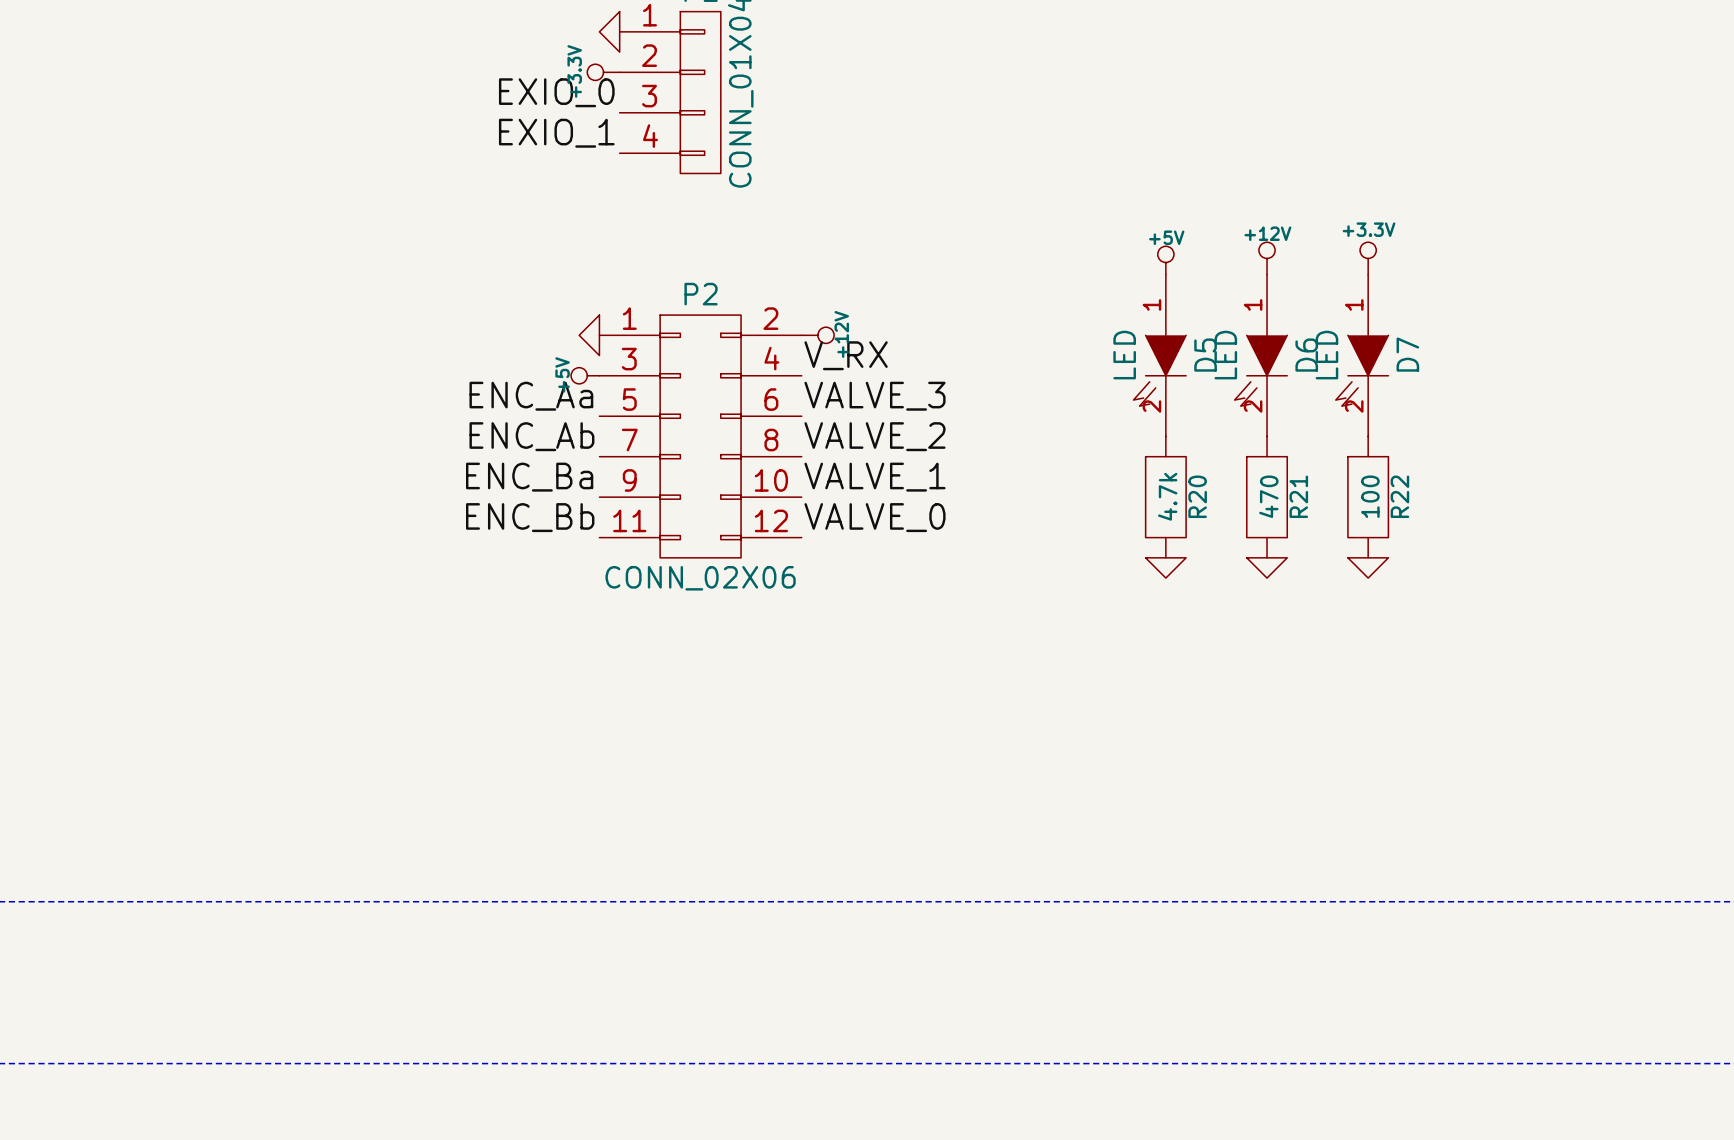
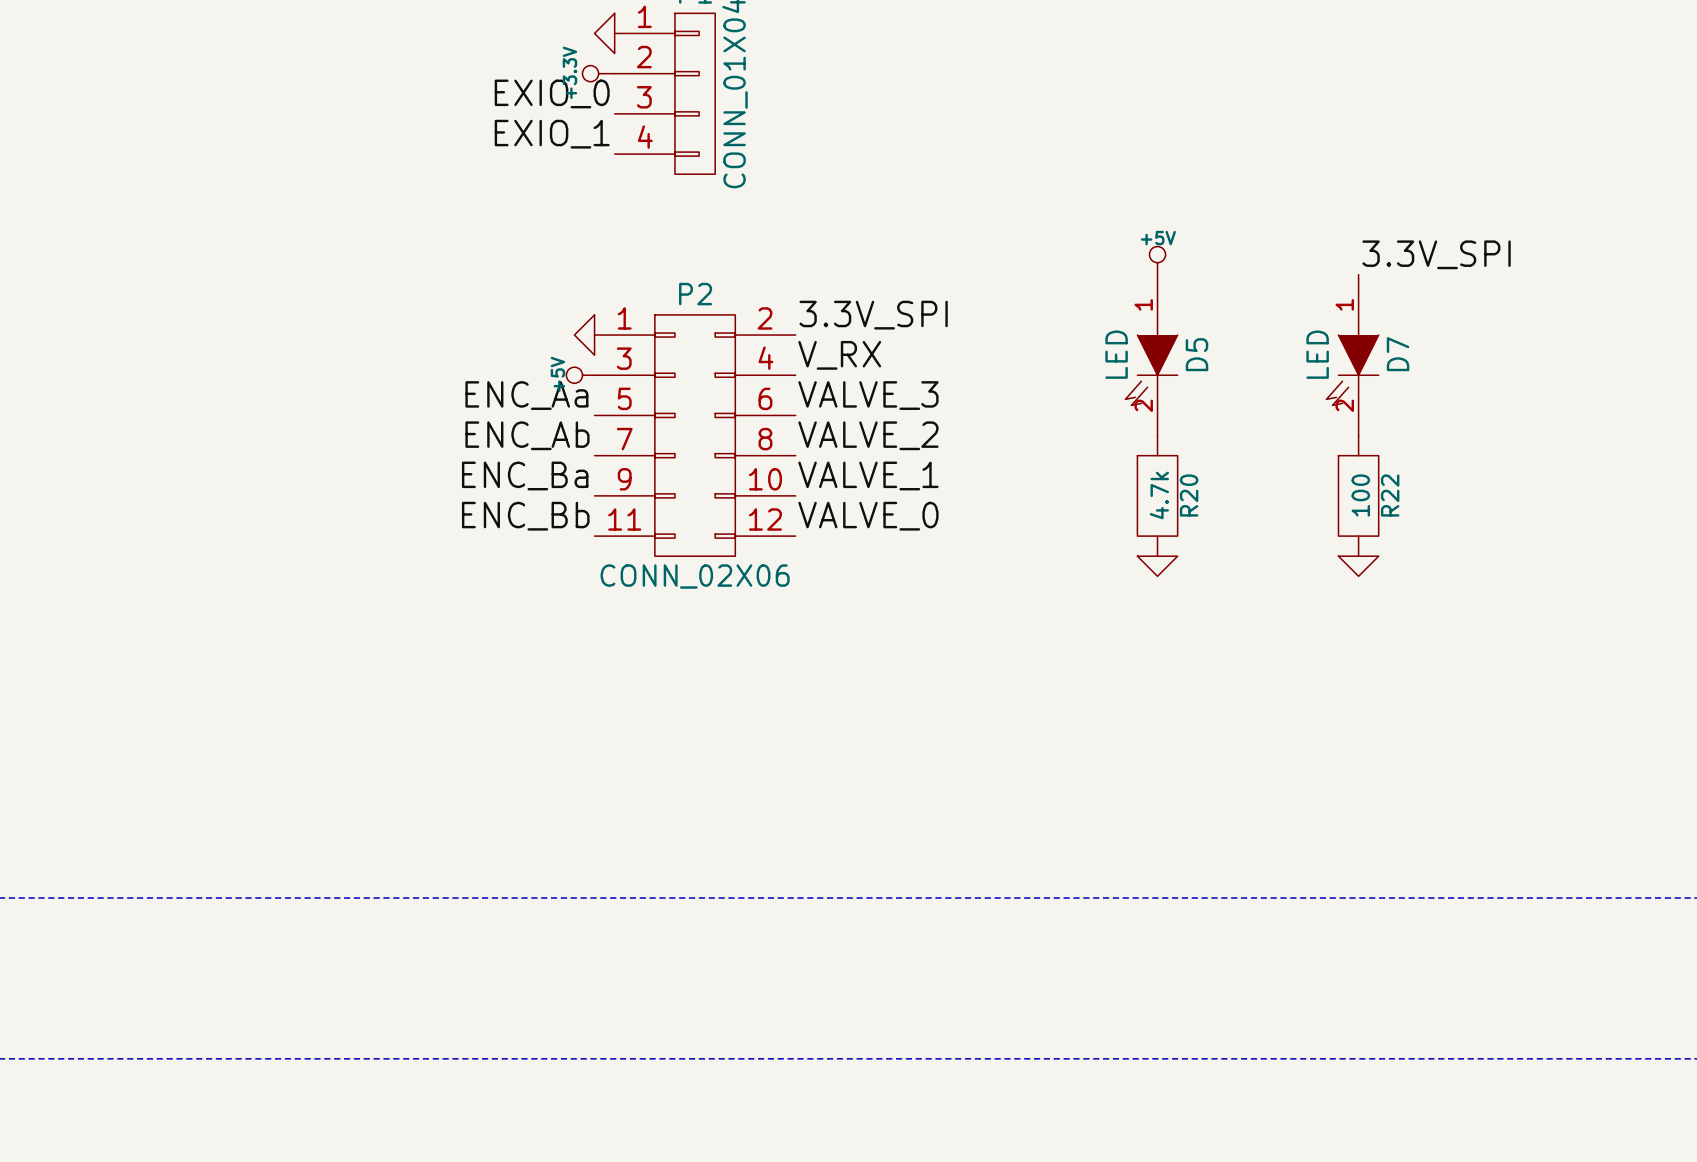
label: none -> 3.3V_SPI (1436, 254)
power symbol: +12V (1267, 258) -> none
power symbol: +3.3V (1368, 258) -> none
label: none -> 3.3V_SPI (873, 315)
power symbol: +12V (817, 335) -> none
D6: LED (1260, 355) -> none
R21: 470 (1267, 497) -> none
power symbol: (1267, 567) -> none

